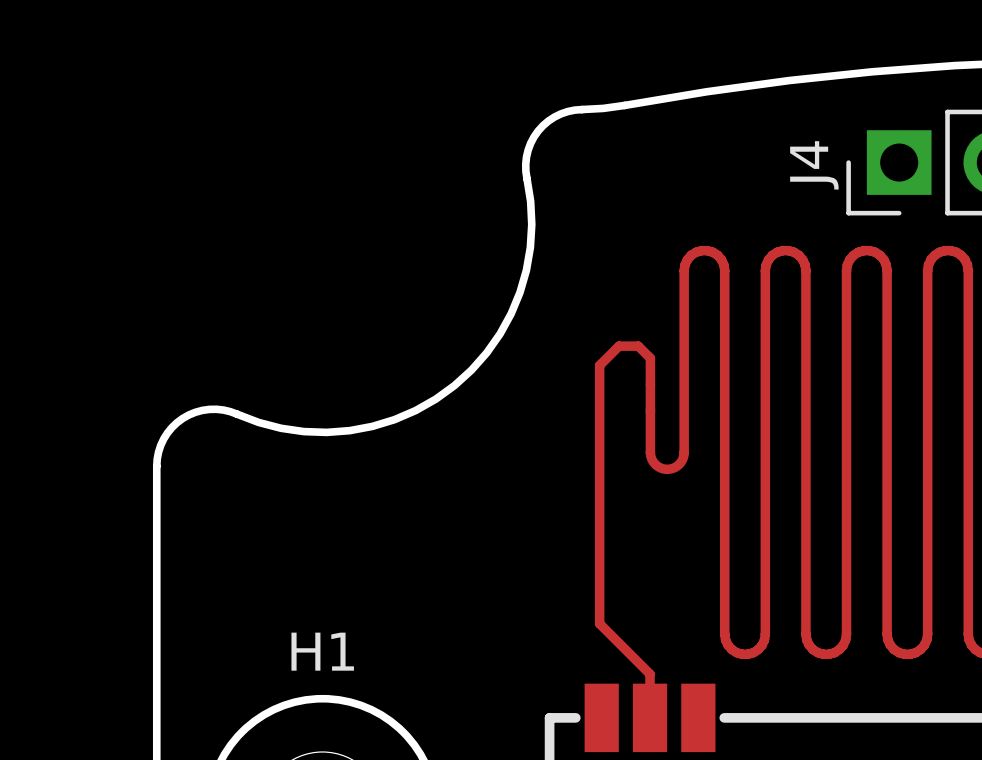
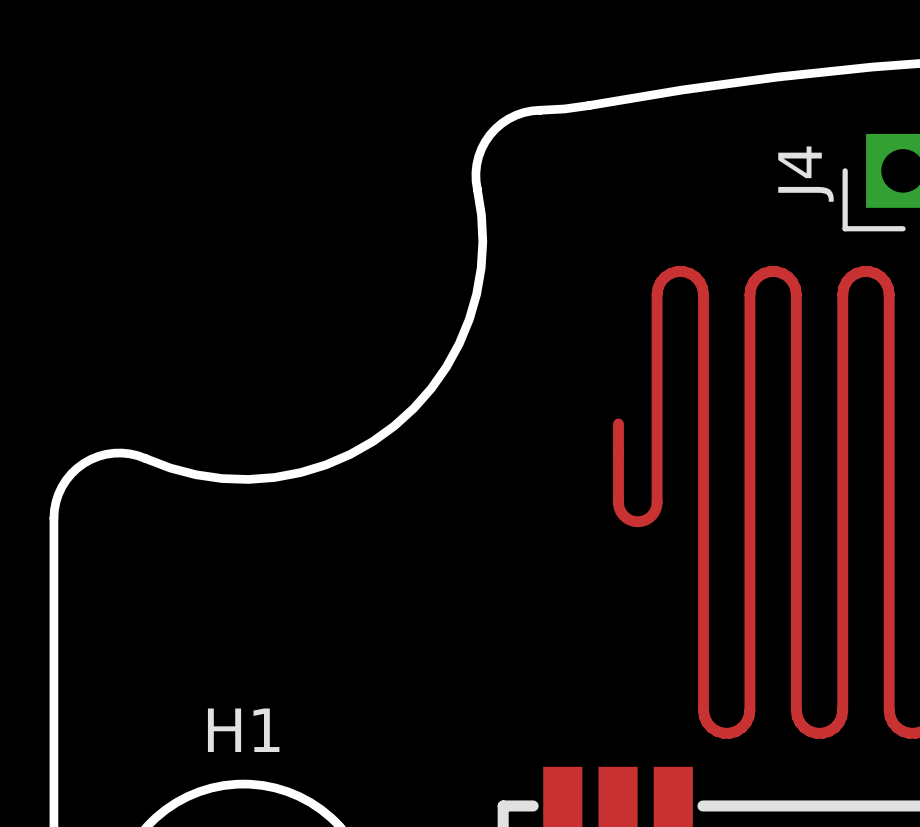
track: (650, 384) (650, 358) (638, 346) (618, 346) (599, 365) (599, 623) (650, 674) (650, 717) -> none

